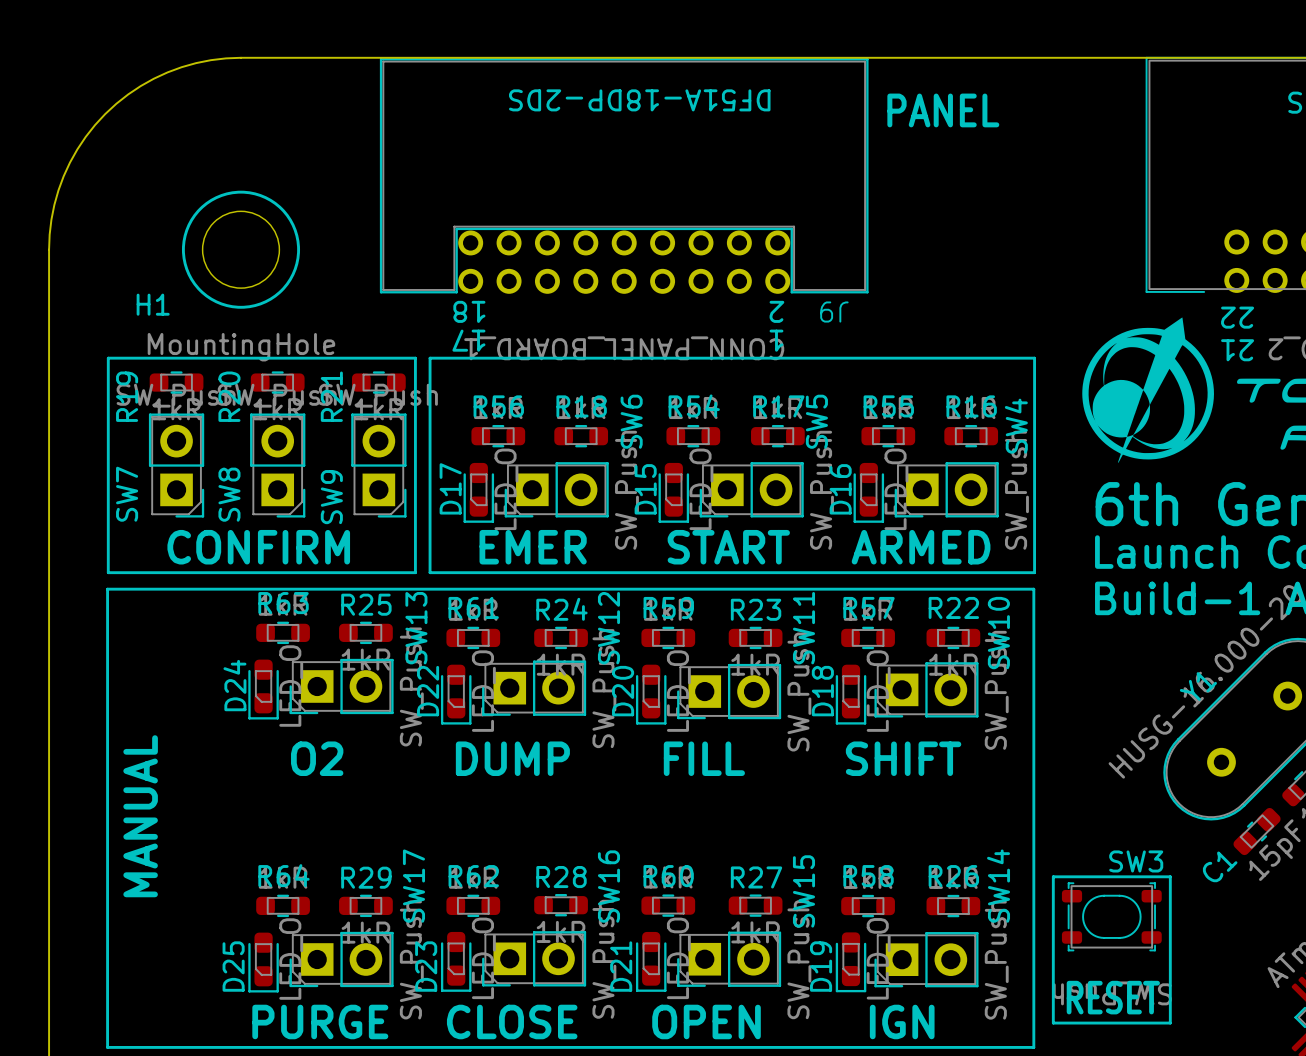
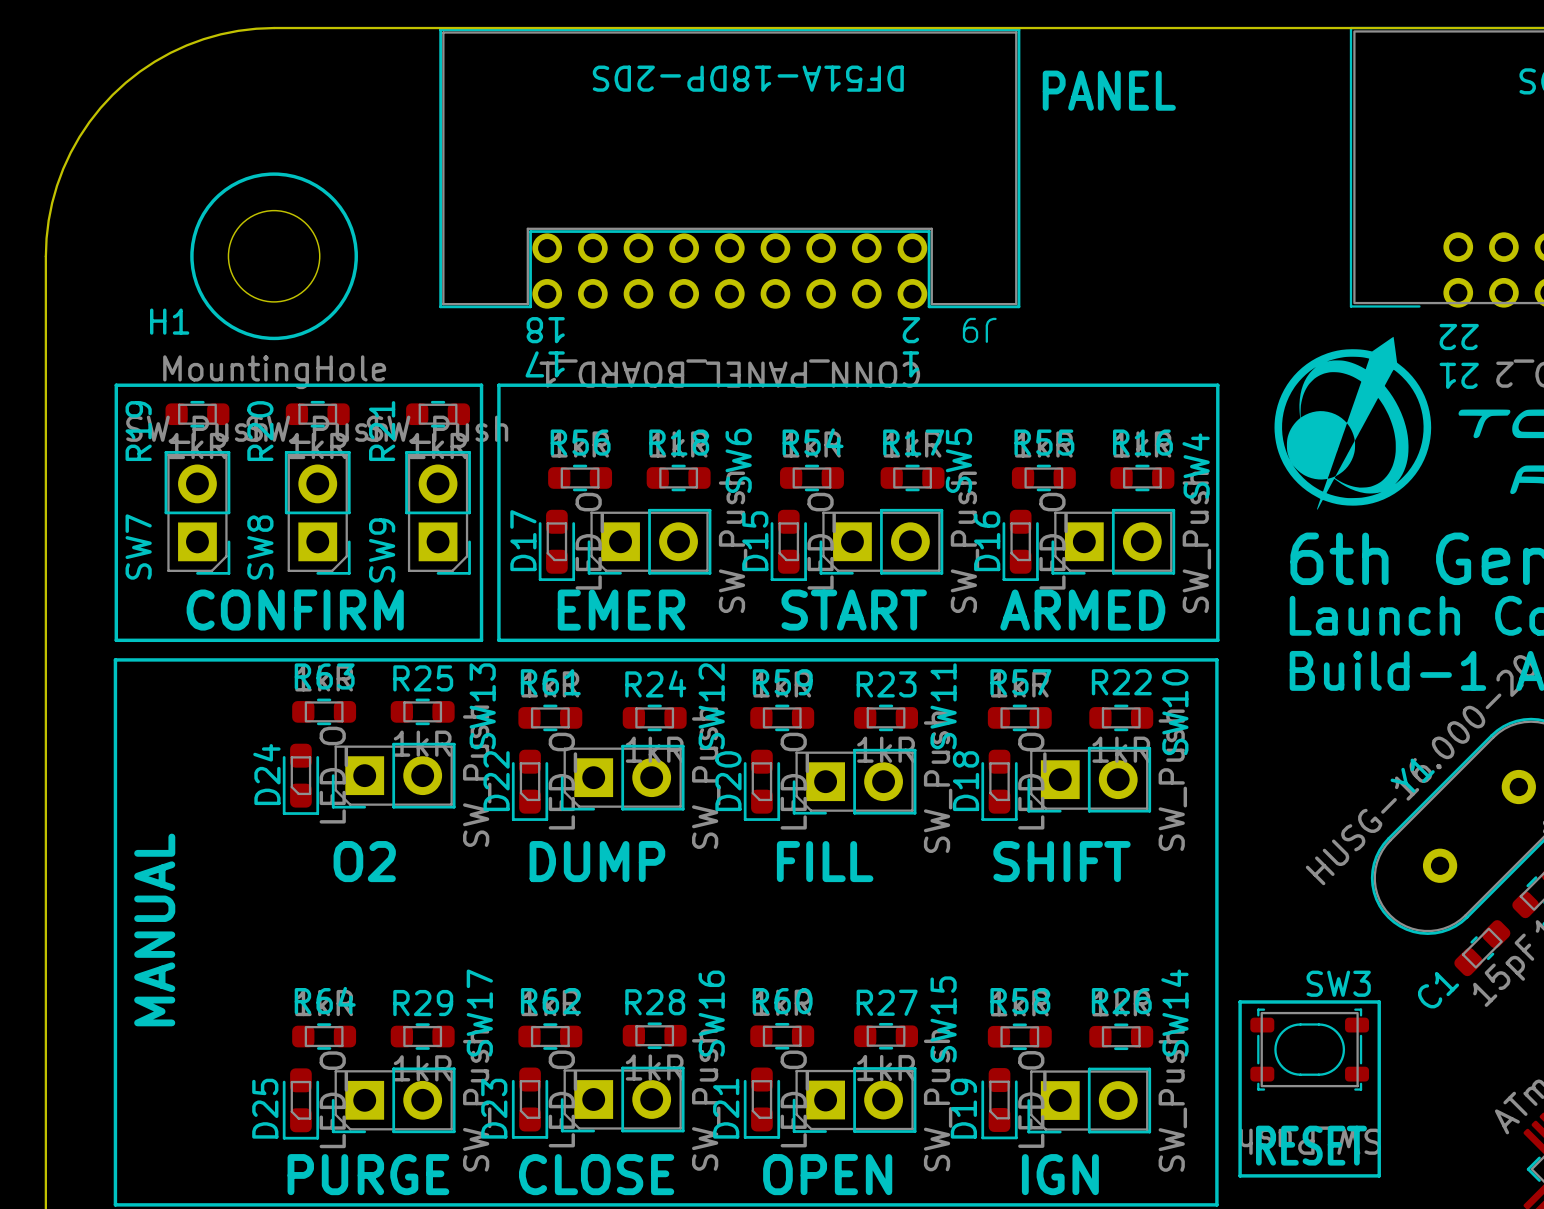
drawing shape: [181, 190, 301, 309] -> [190, 172, 358, 341]

